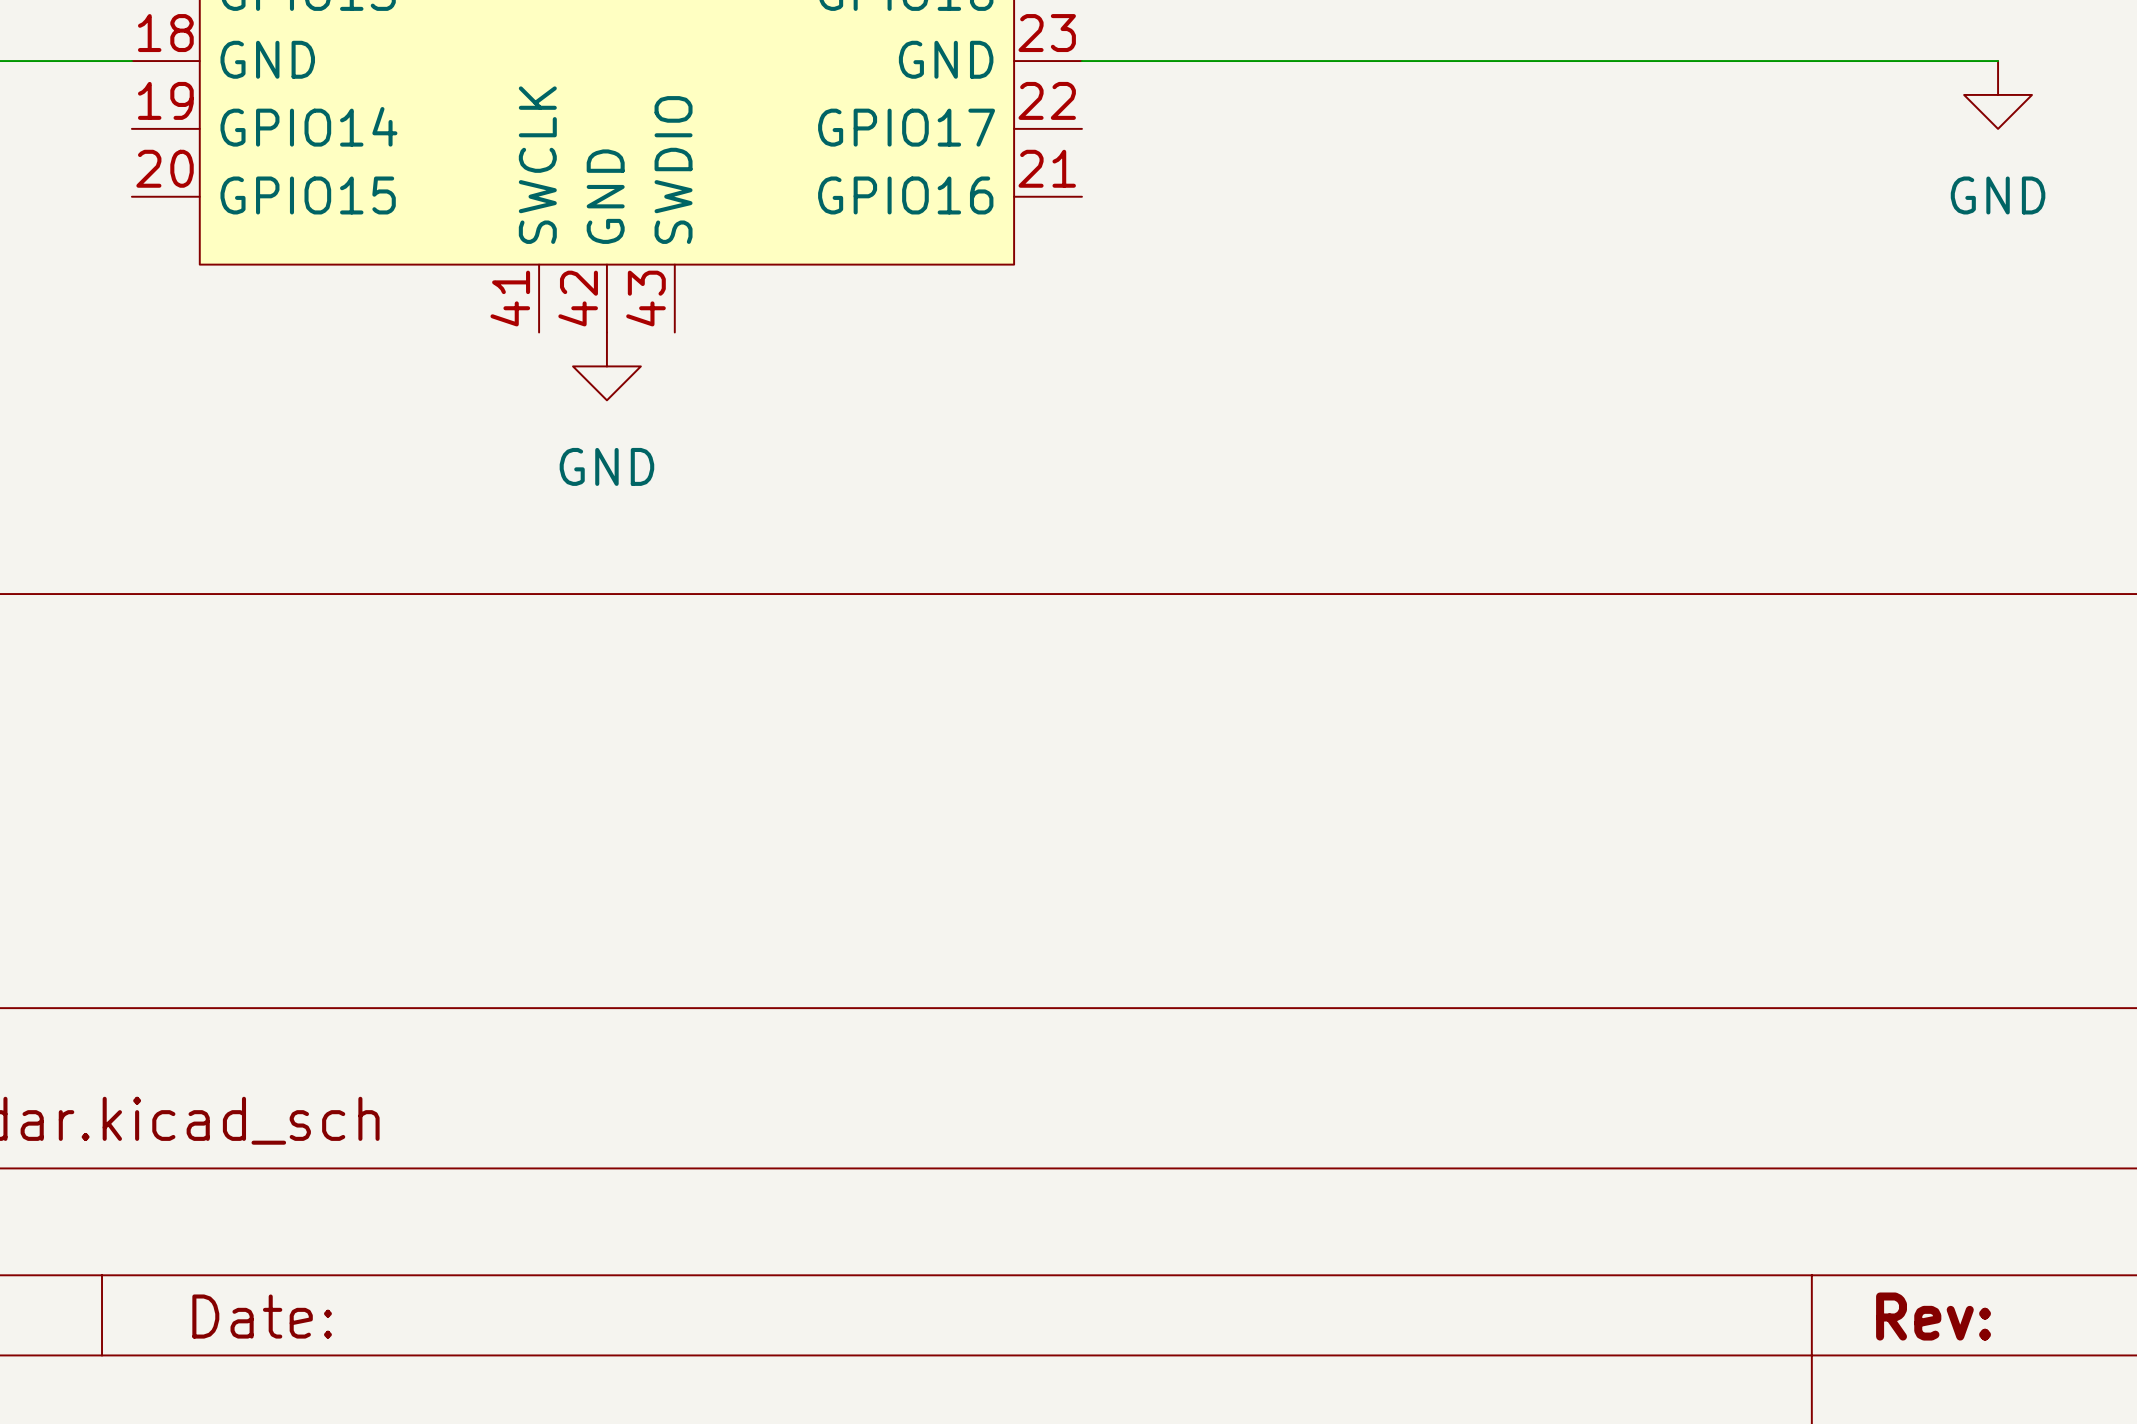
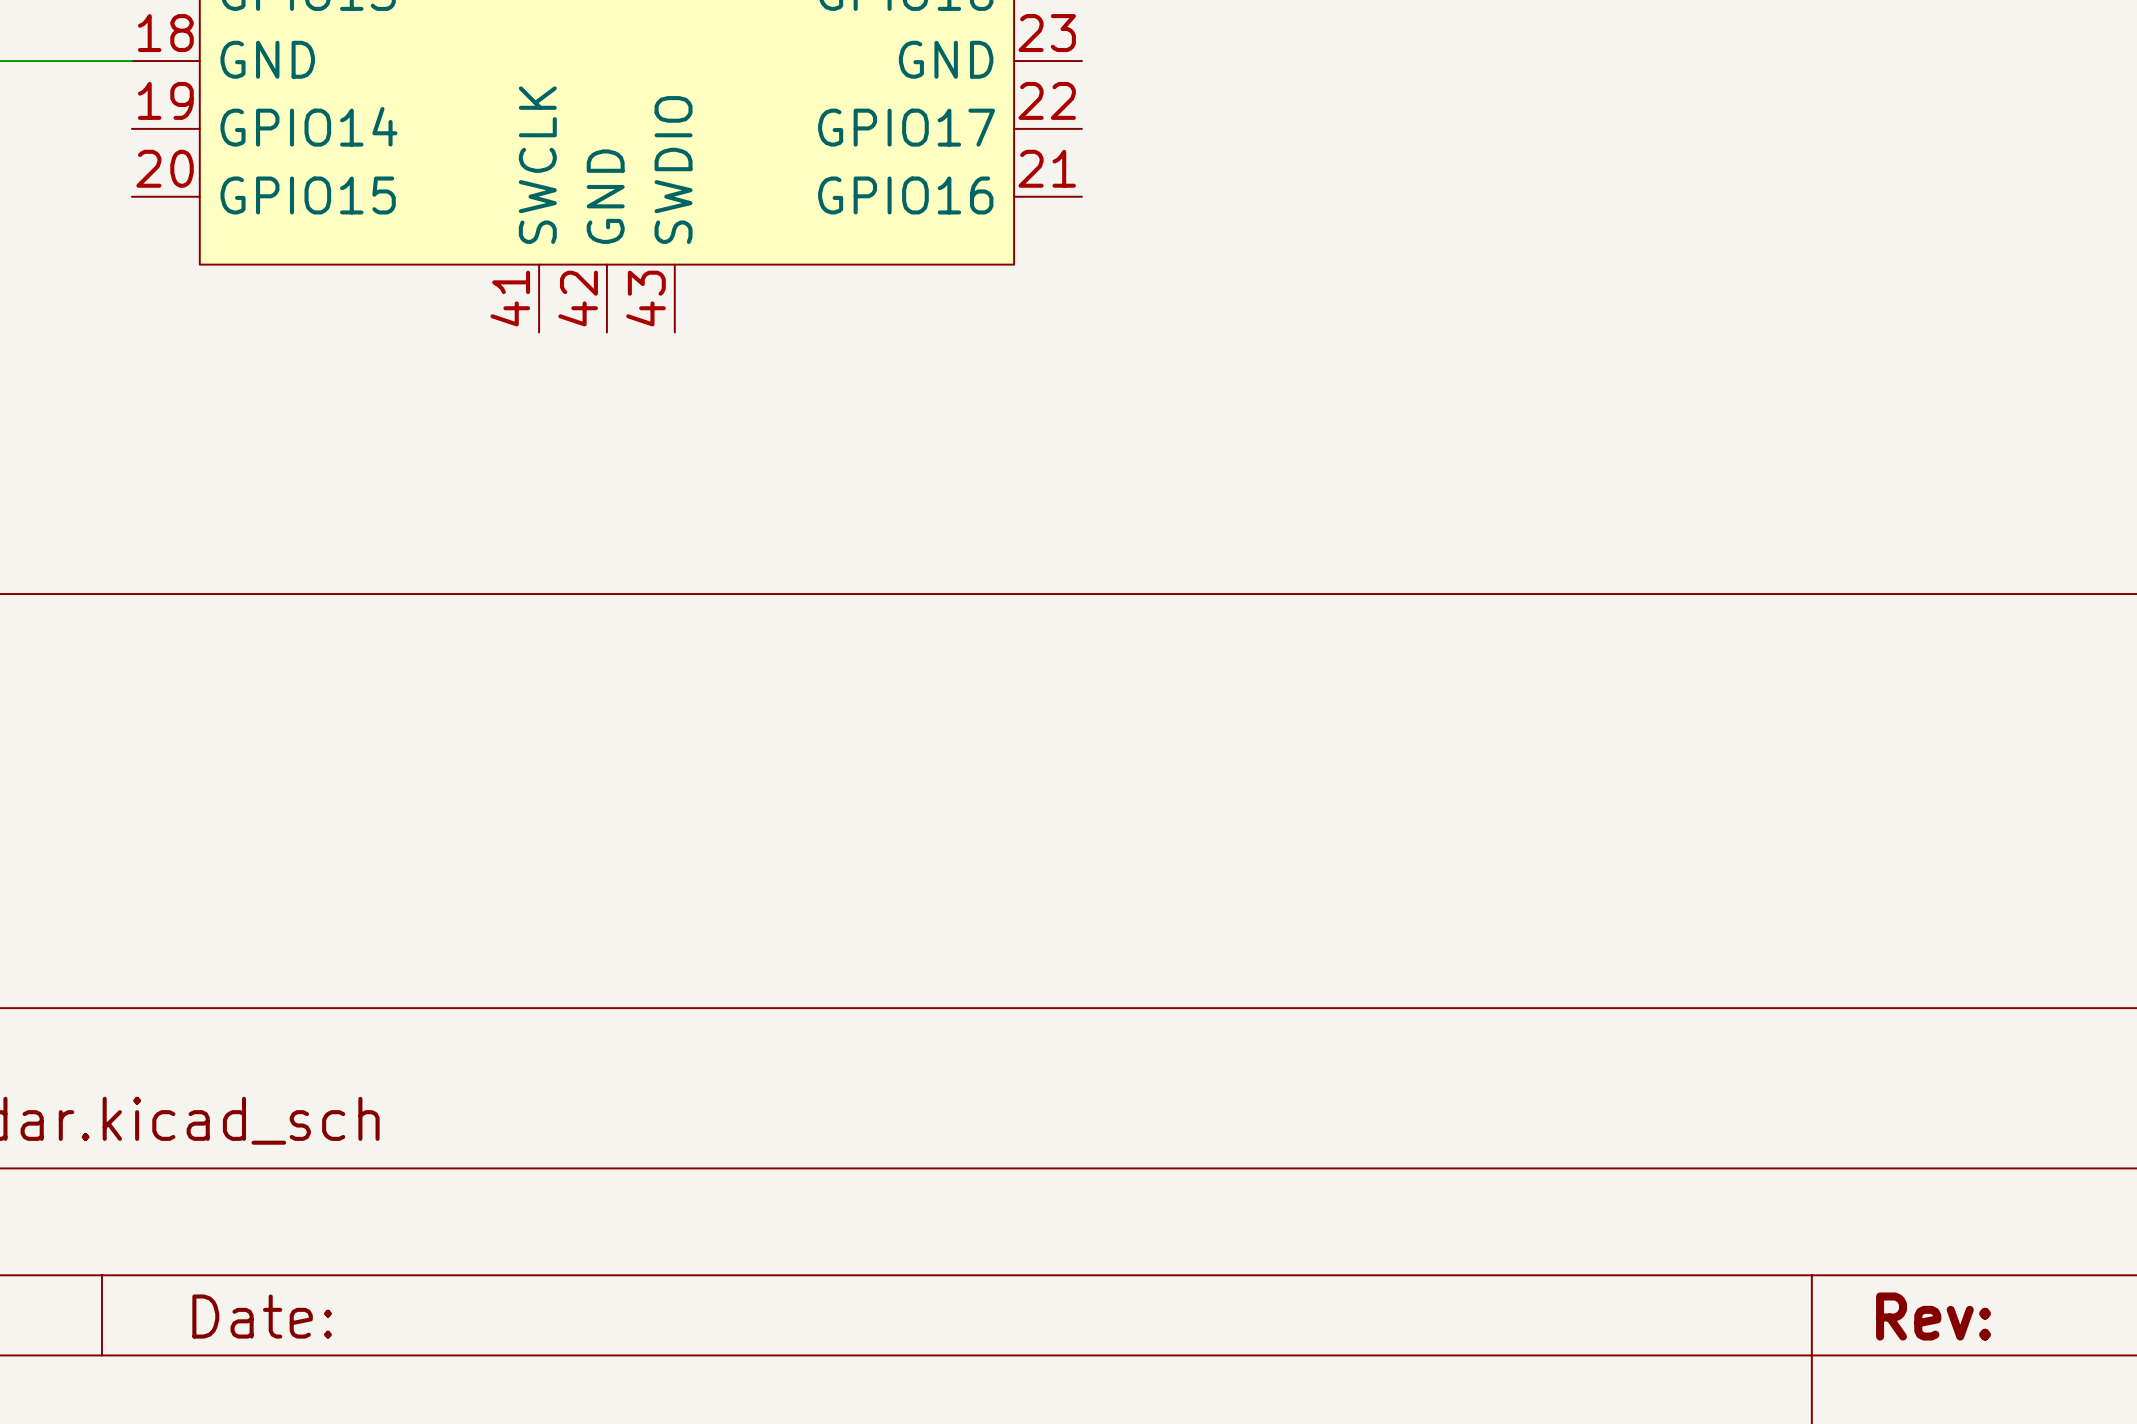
wire: (1081, 61) (1998, 61) -> none
power symbol: GND (1998, 94) -> none
power symbol: GND (606, 366) -> none

